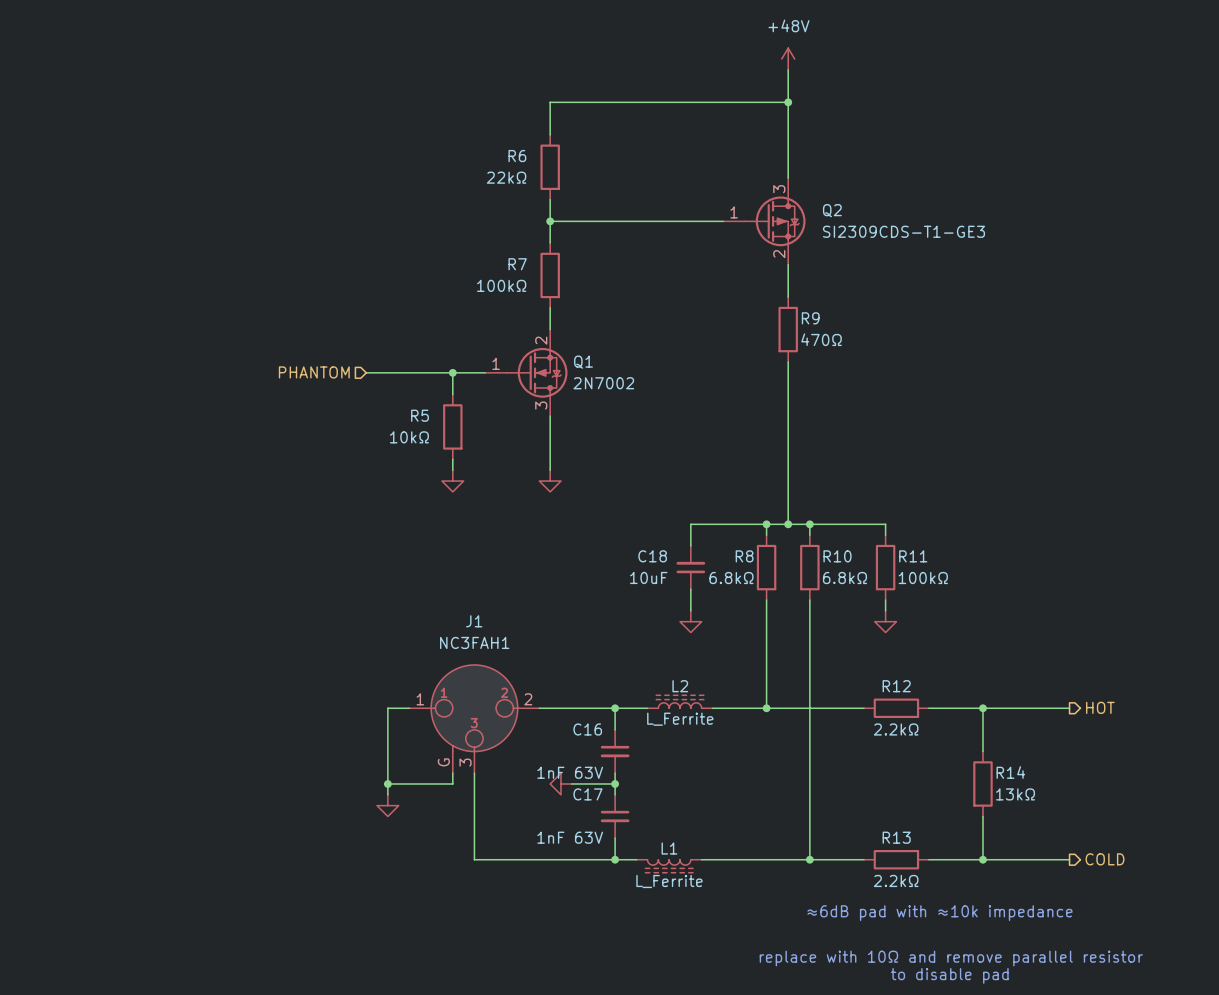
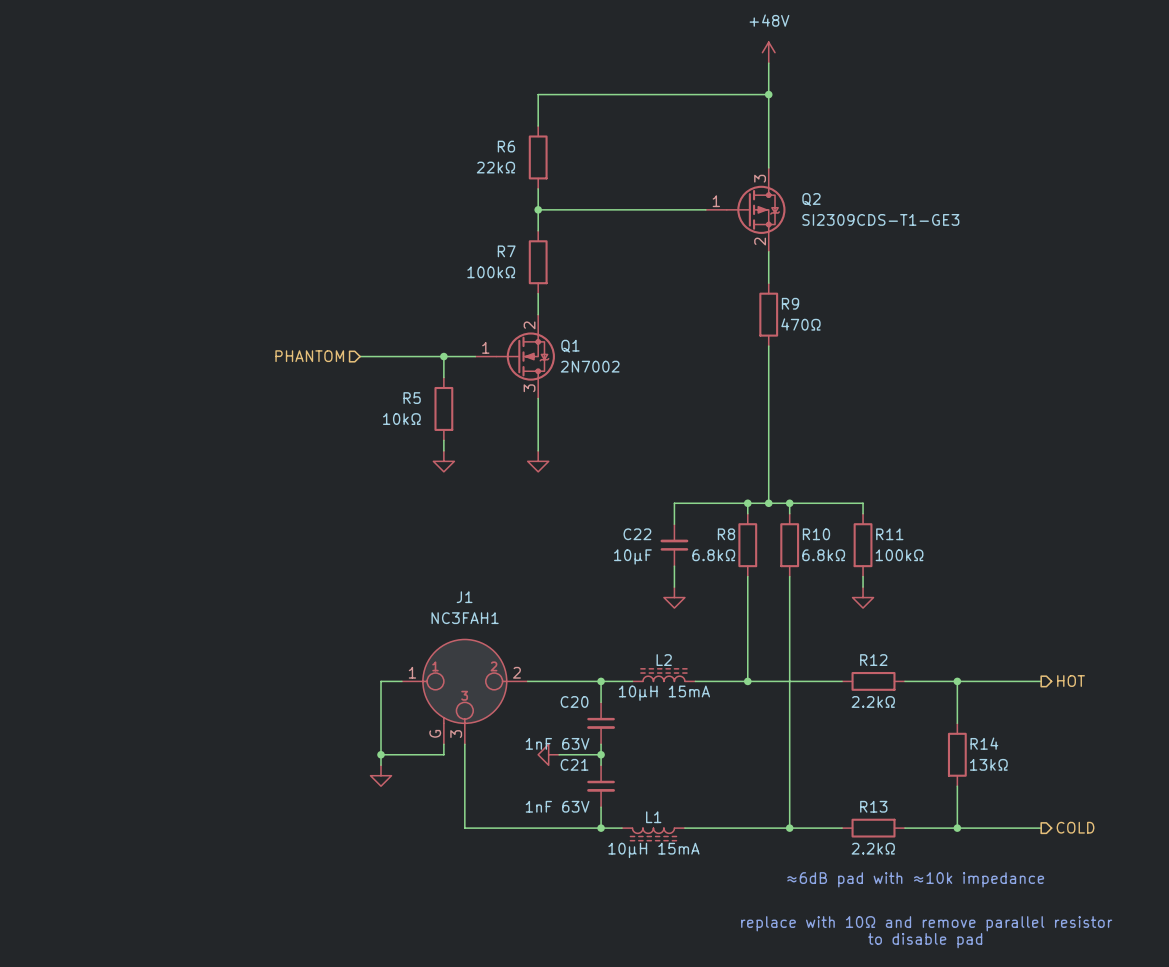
C18 name: C18 (652, 556) -> C22 (637, 534)
C18 value: 10uF (648, 577) -> 10μF (632, 556)
L2 value: L_Ferrite (680, 719) -> 10μH 15mA (664, 693)
C16 name: C16 (587, 729) -> C20 (574, 701)
C17 name: C17 (587, 794) -> C21 (574, 764)
L1 value: L_Ferrite (669, 881) -> 10μH 15mA (653, 850)

